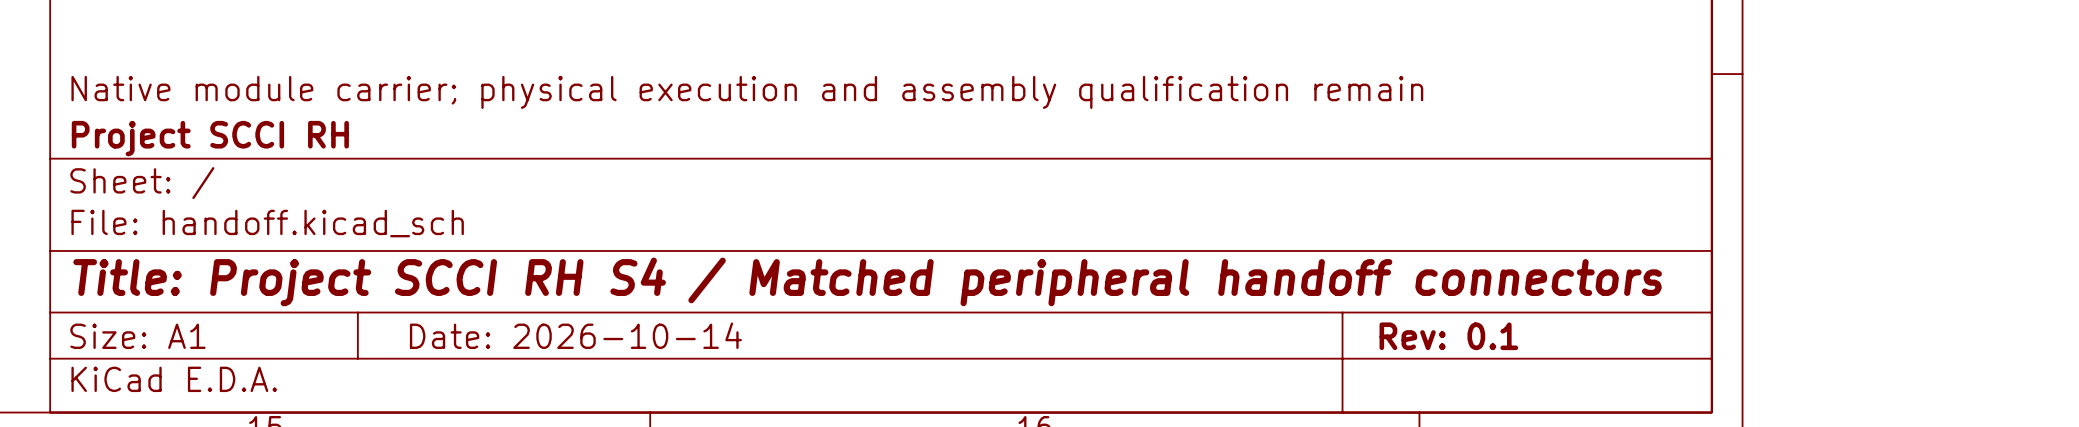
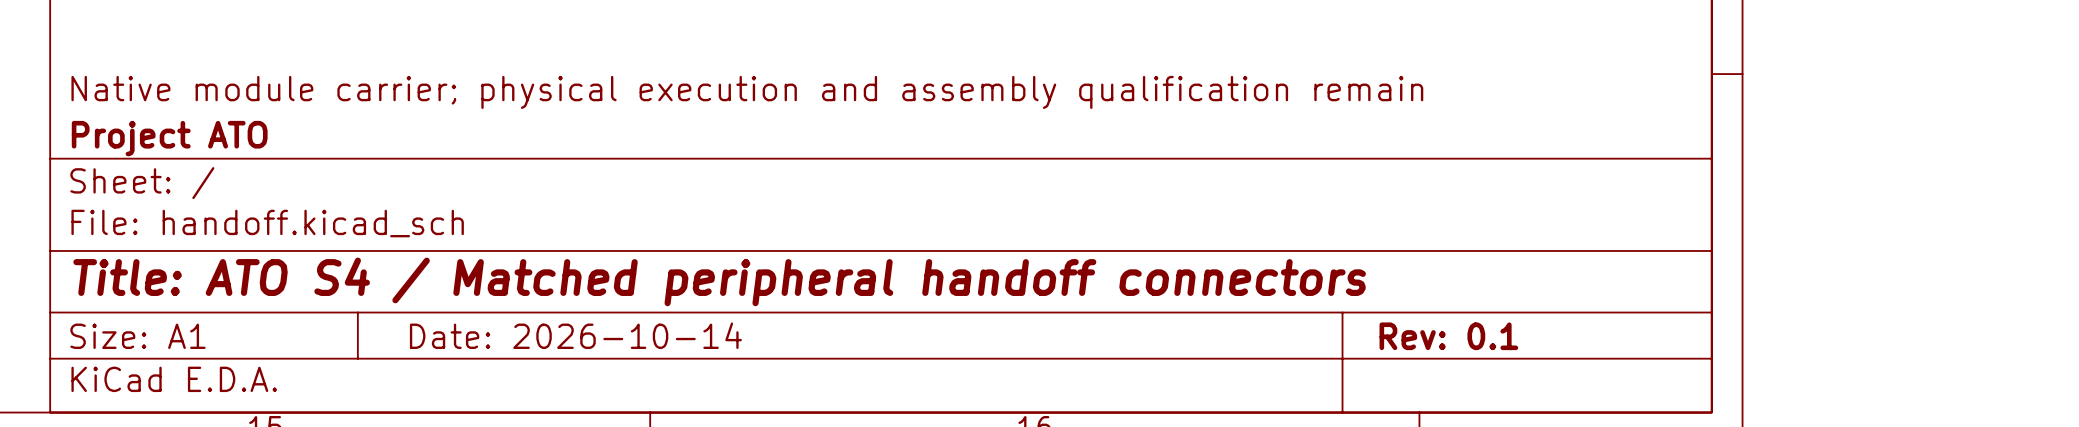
title block: Project SCCI RH (210, 138) -> Project ATO (169, 138)
title block: Title: Project SCCI RH S4 / Matched peripheral handoff connectors (867, 281) -> Title: ATO S4 / Matched peripheral handoff connectors (719, 281)

